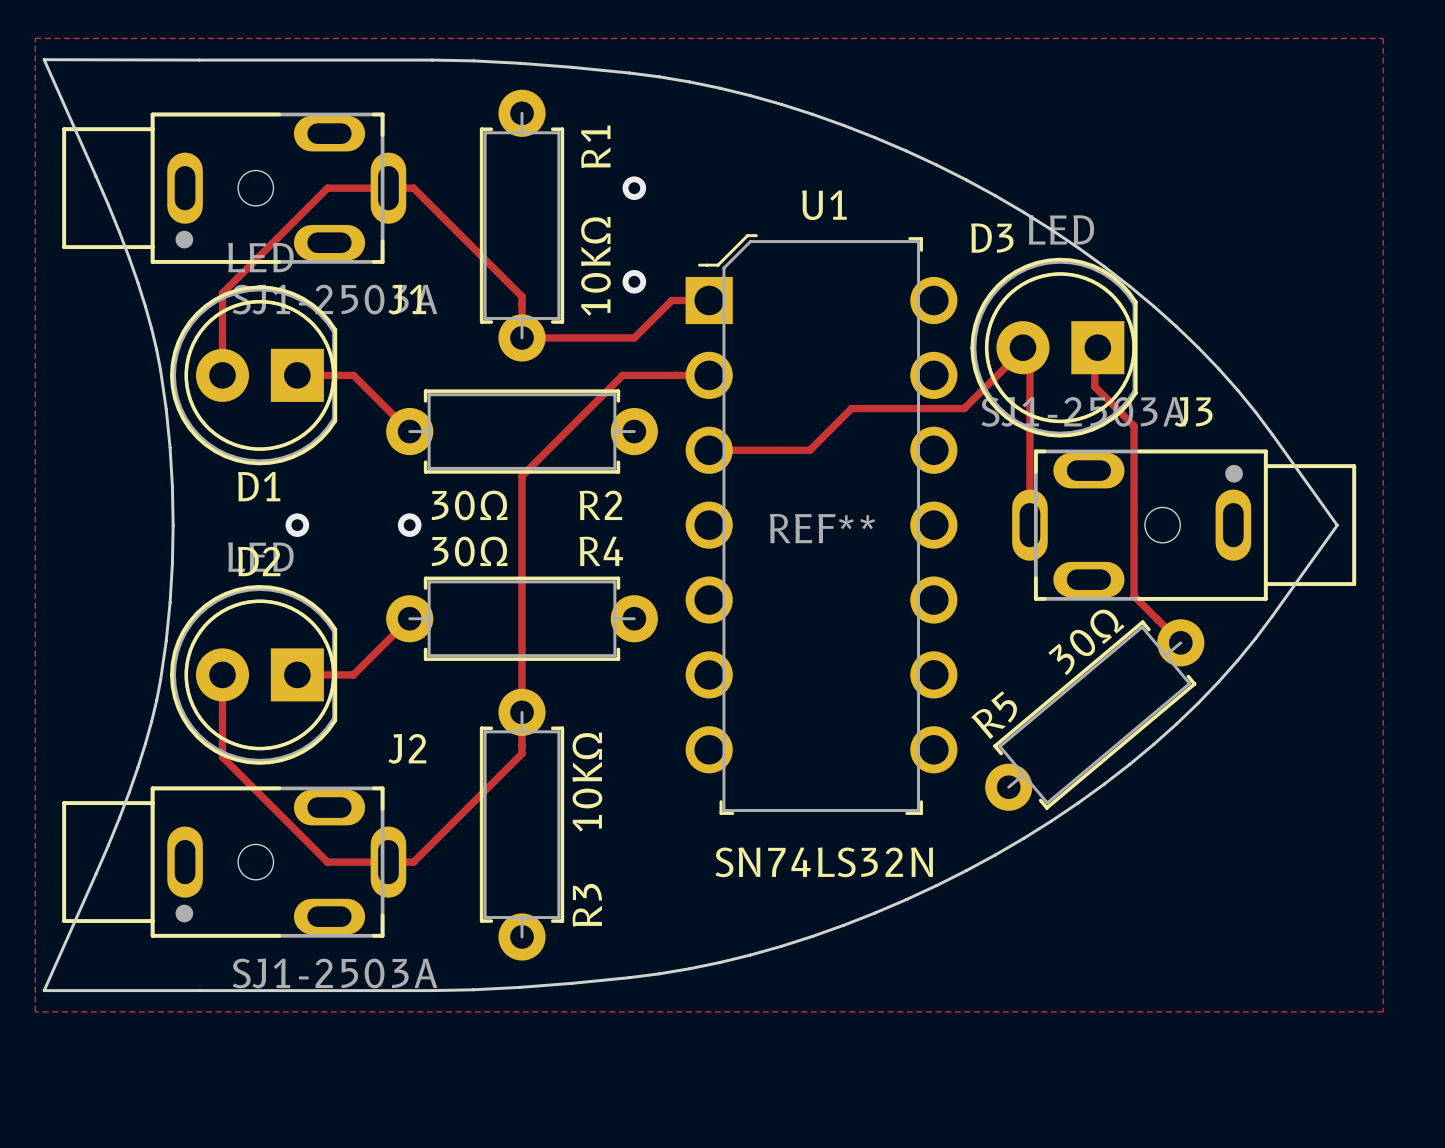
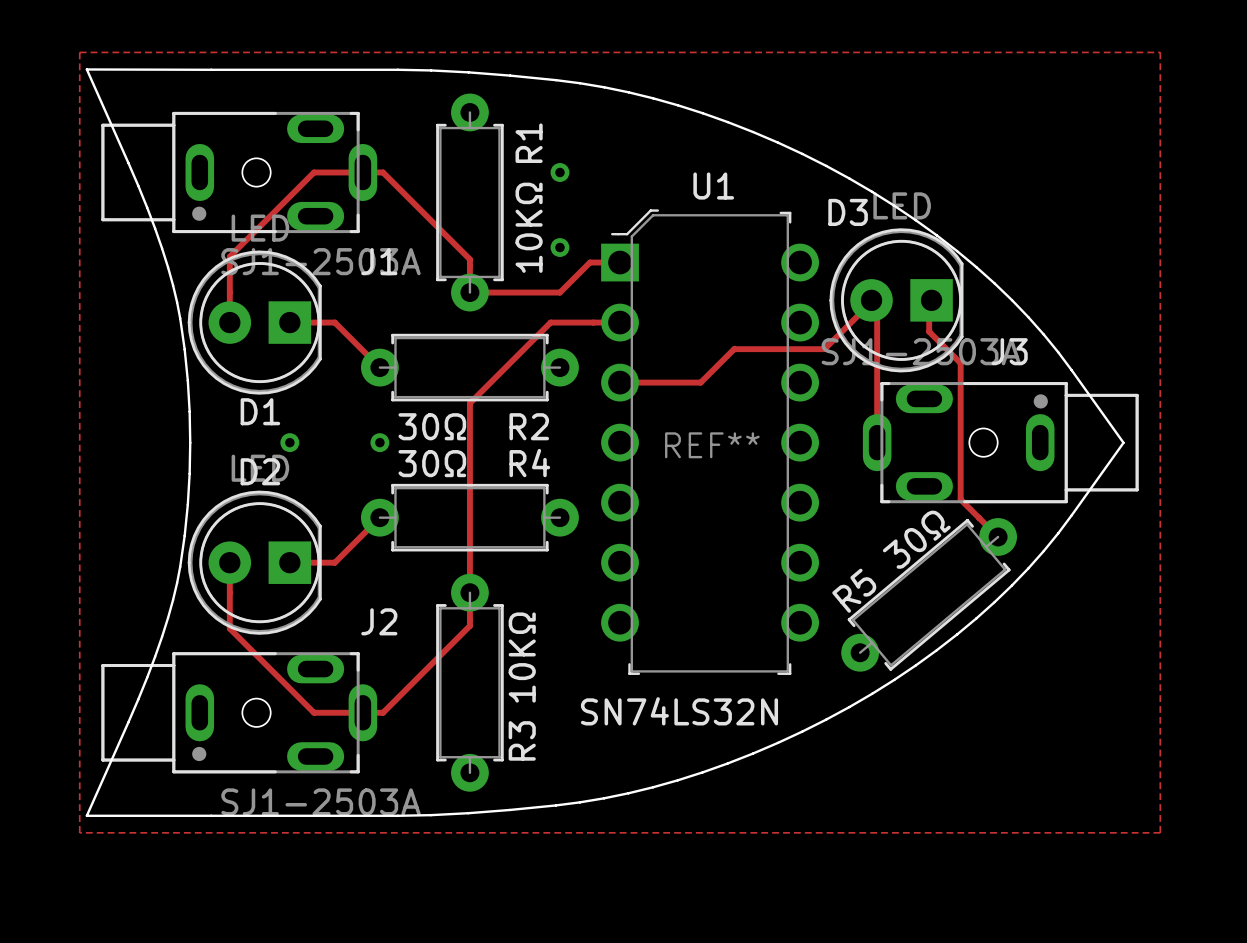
U1 value position: SN74LS32N (824, 862) -> SN74LS32N (679, 711)

